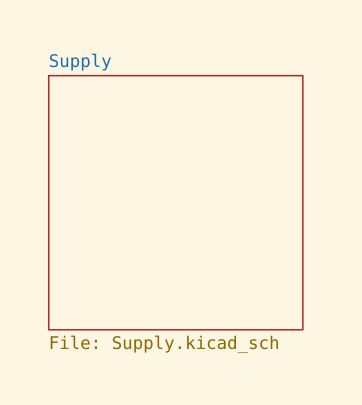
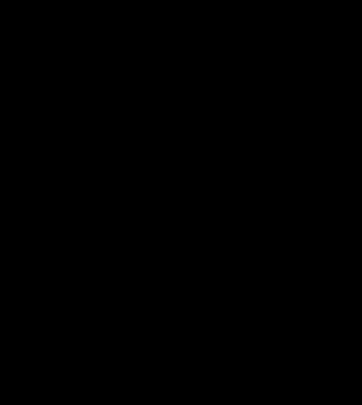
sheet Supply: File: Supply.kicad_sch (175, 202) -> none

